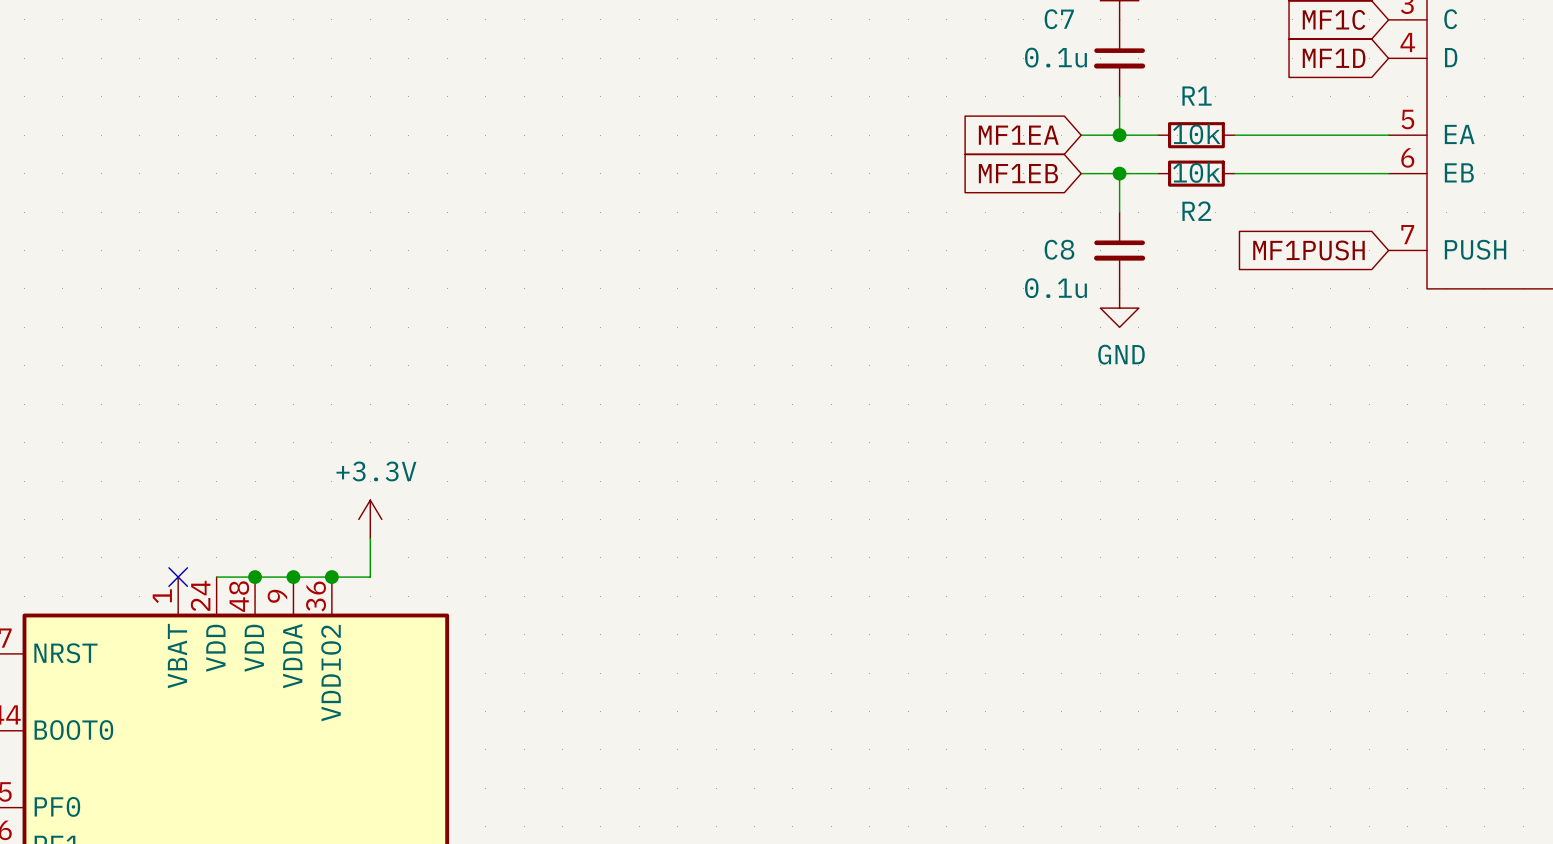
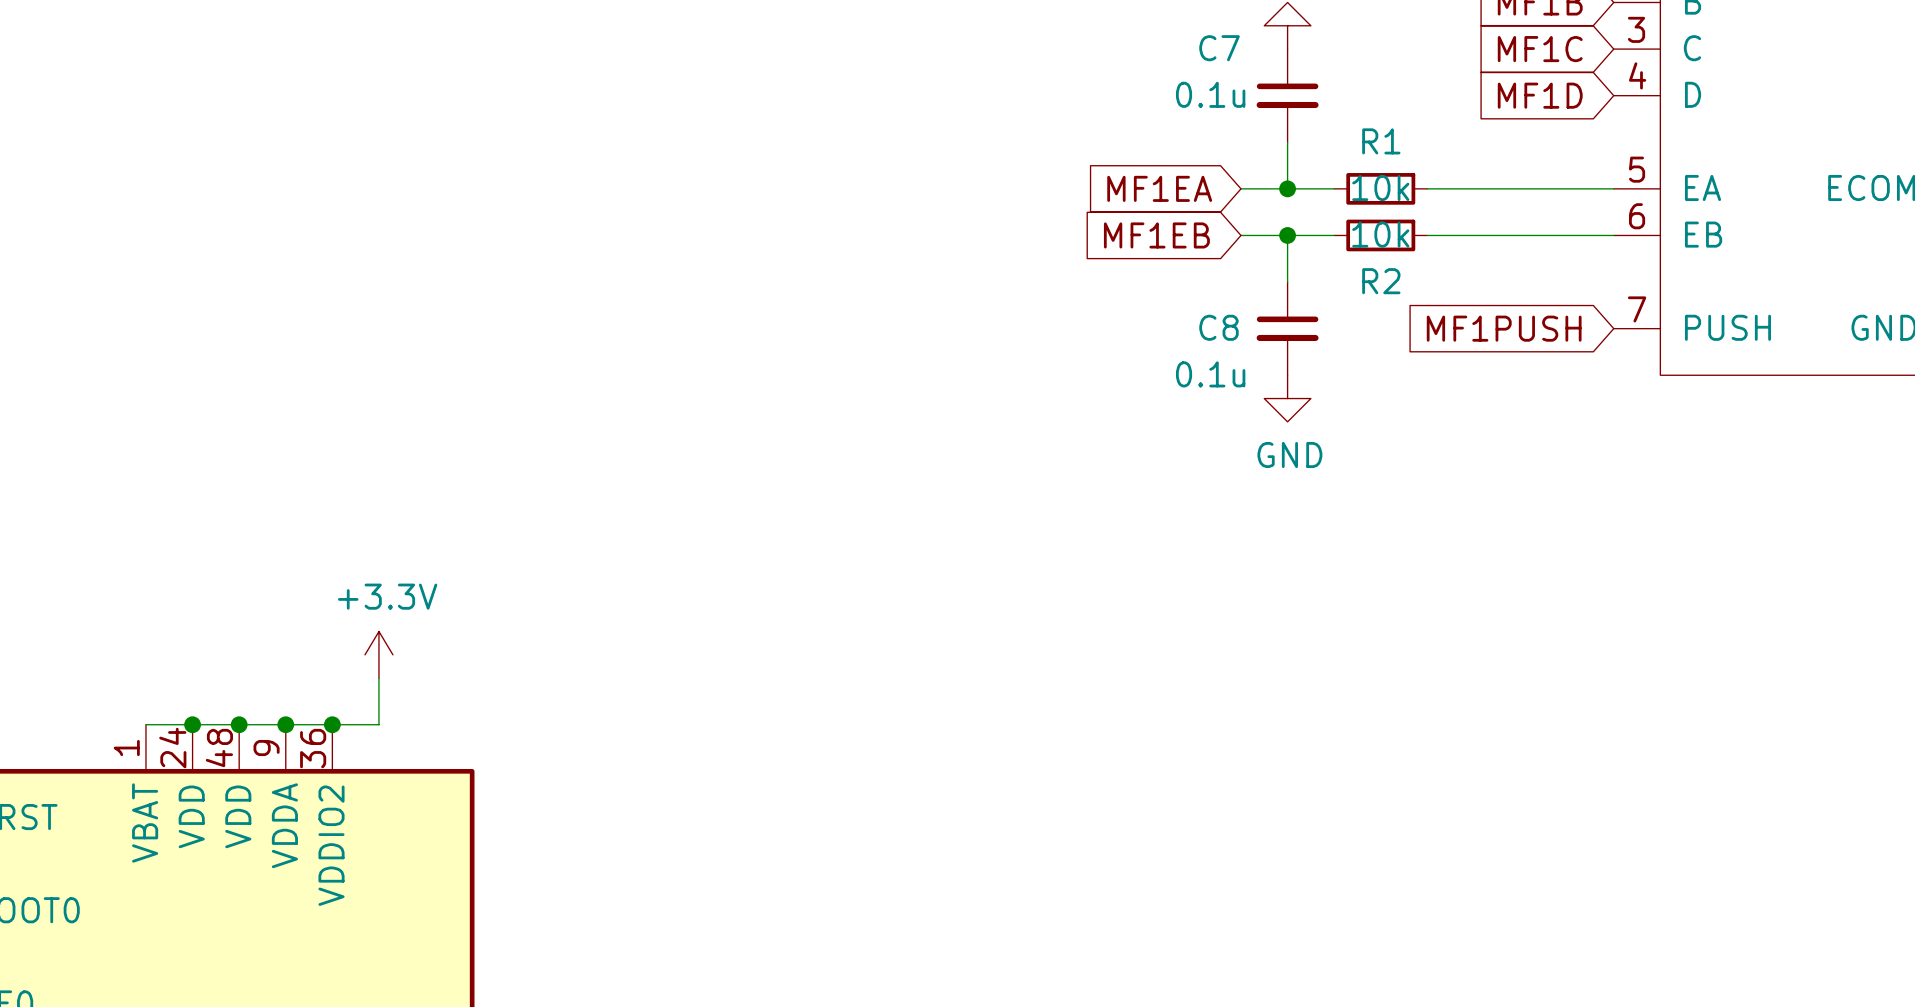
wire: none -> (145, 724) (192, 724)
no-connect mark: (178, 577) -> none
junction: none -> (192, 724)

